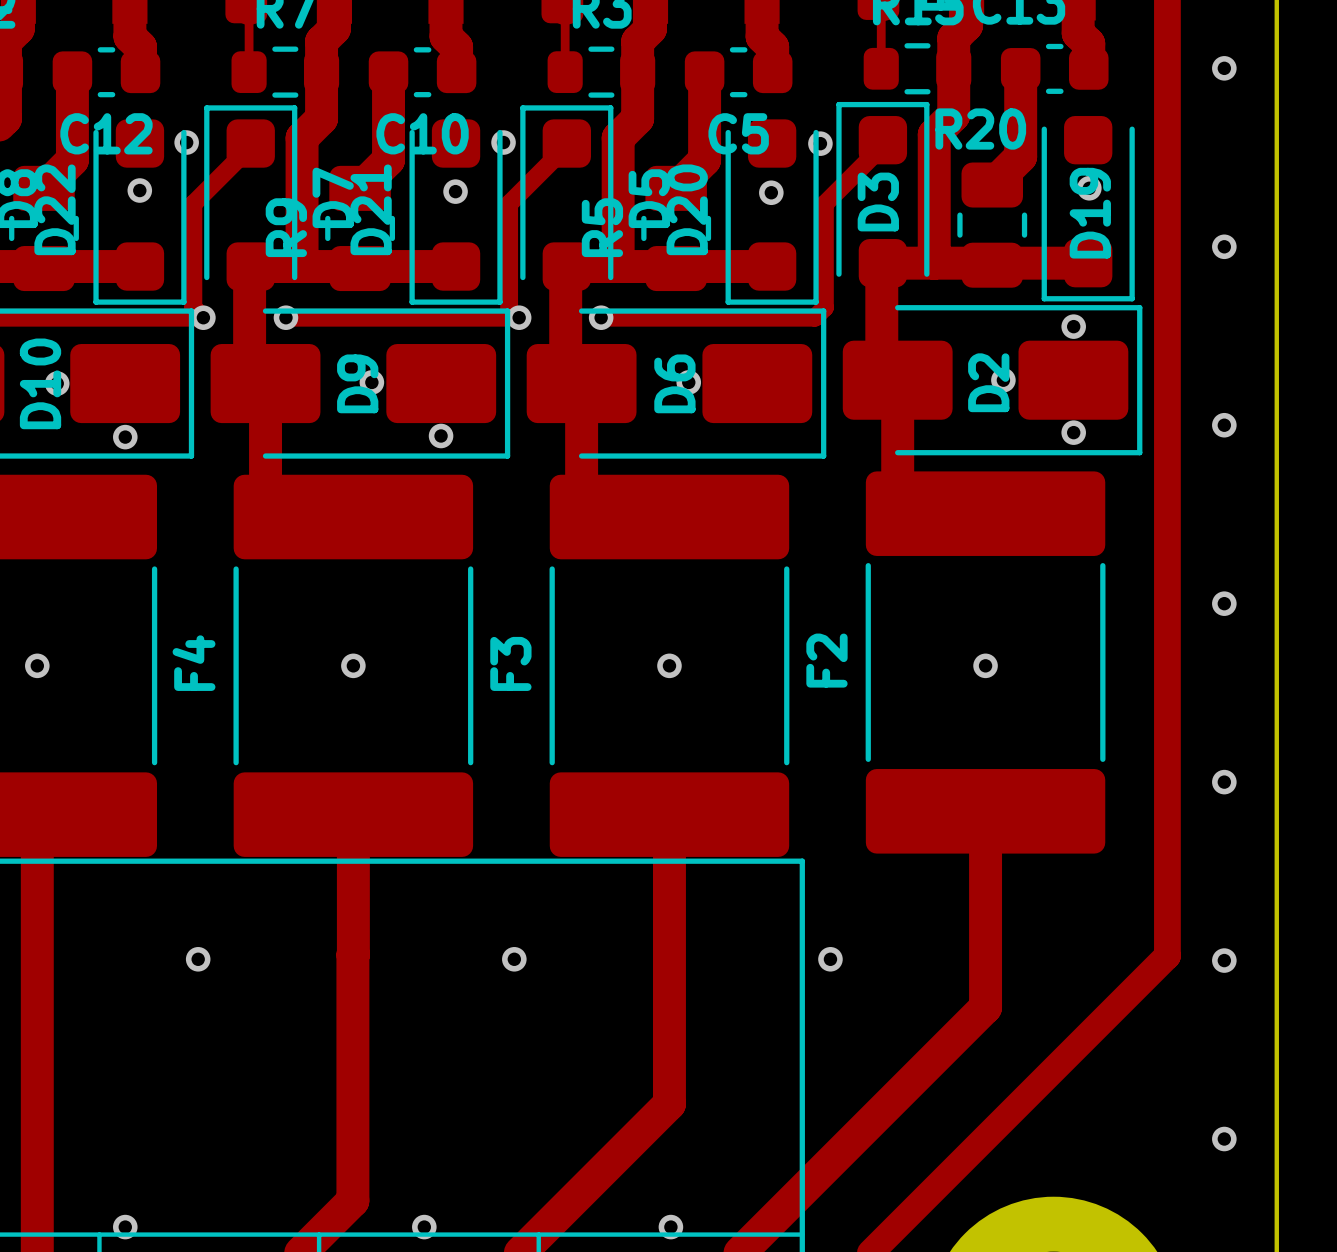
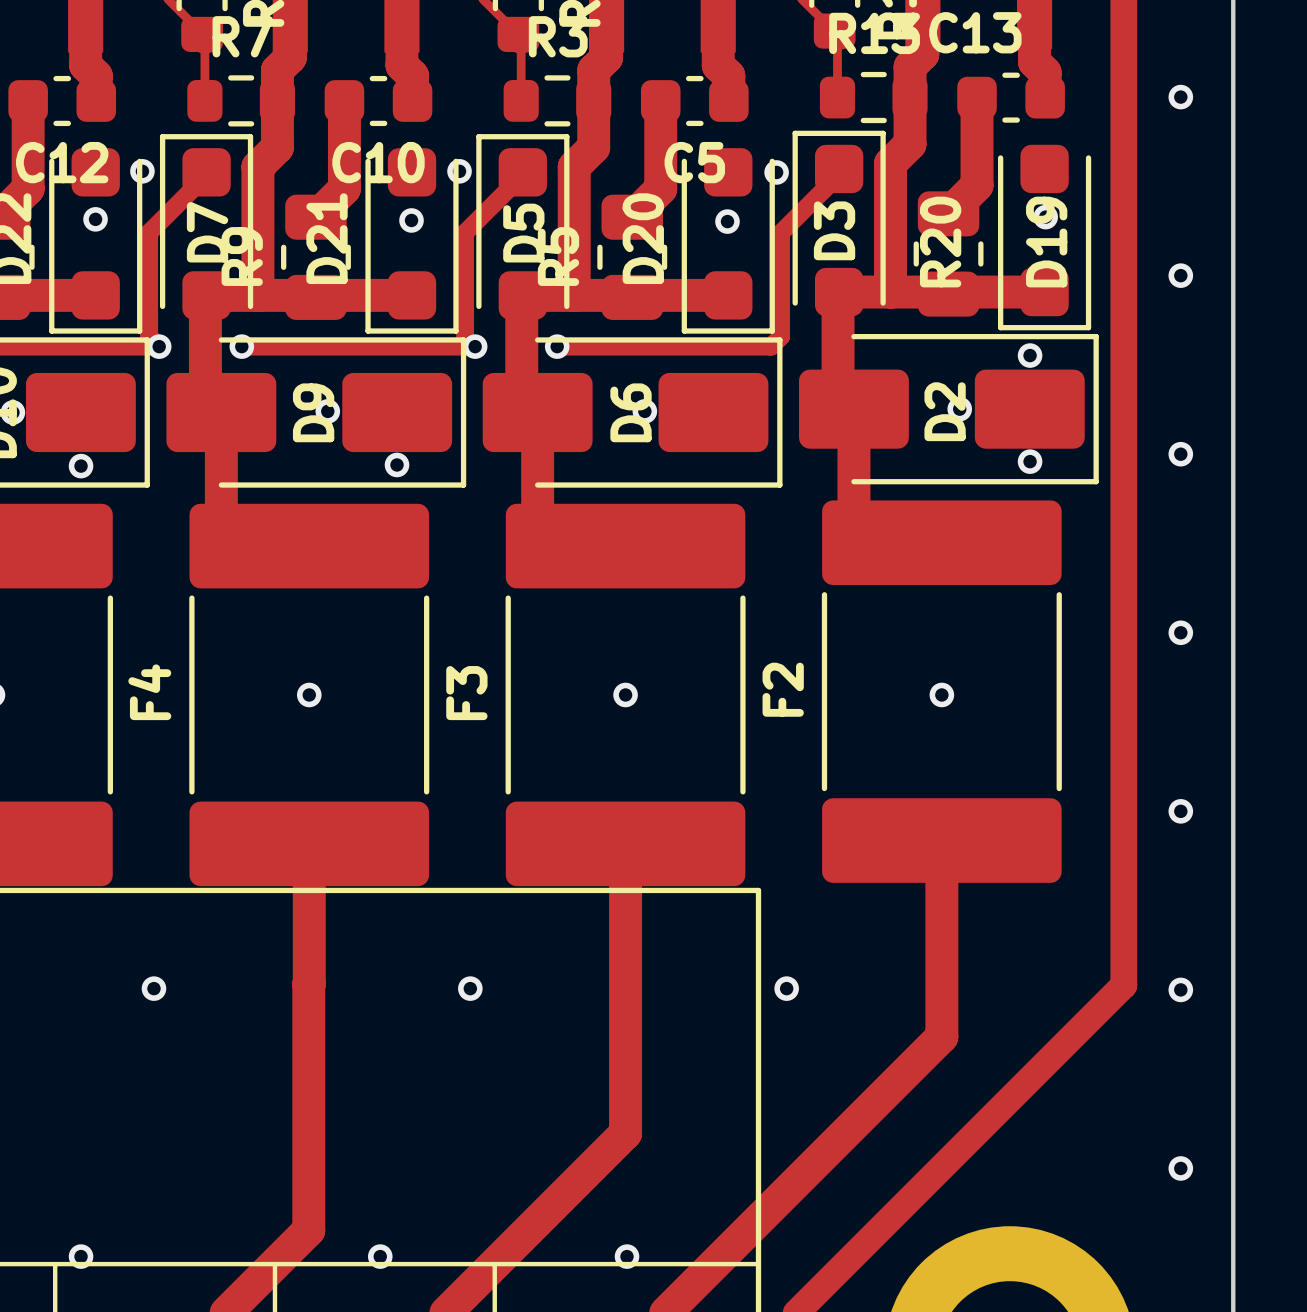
R20 name rotation: 0° (980, 129) -> 90° counterclockwise (940, 242)
D7 name position: D7 (333, 197) -> D7 (207, 232)
D5 name position: D5 (649, 198) -> D5 (523, 233)

